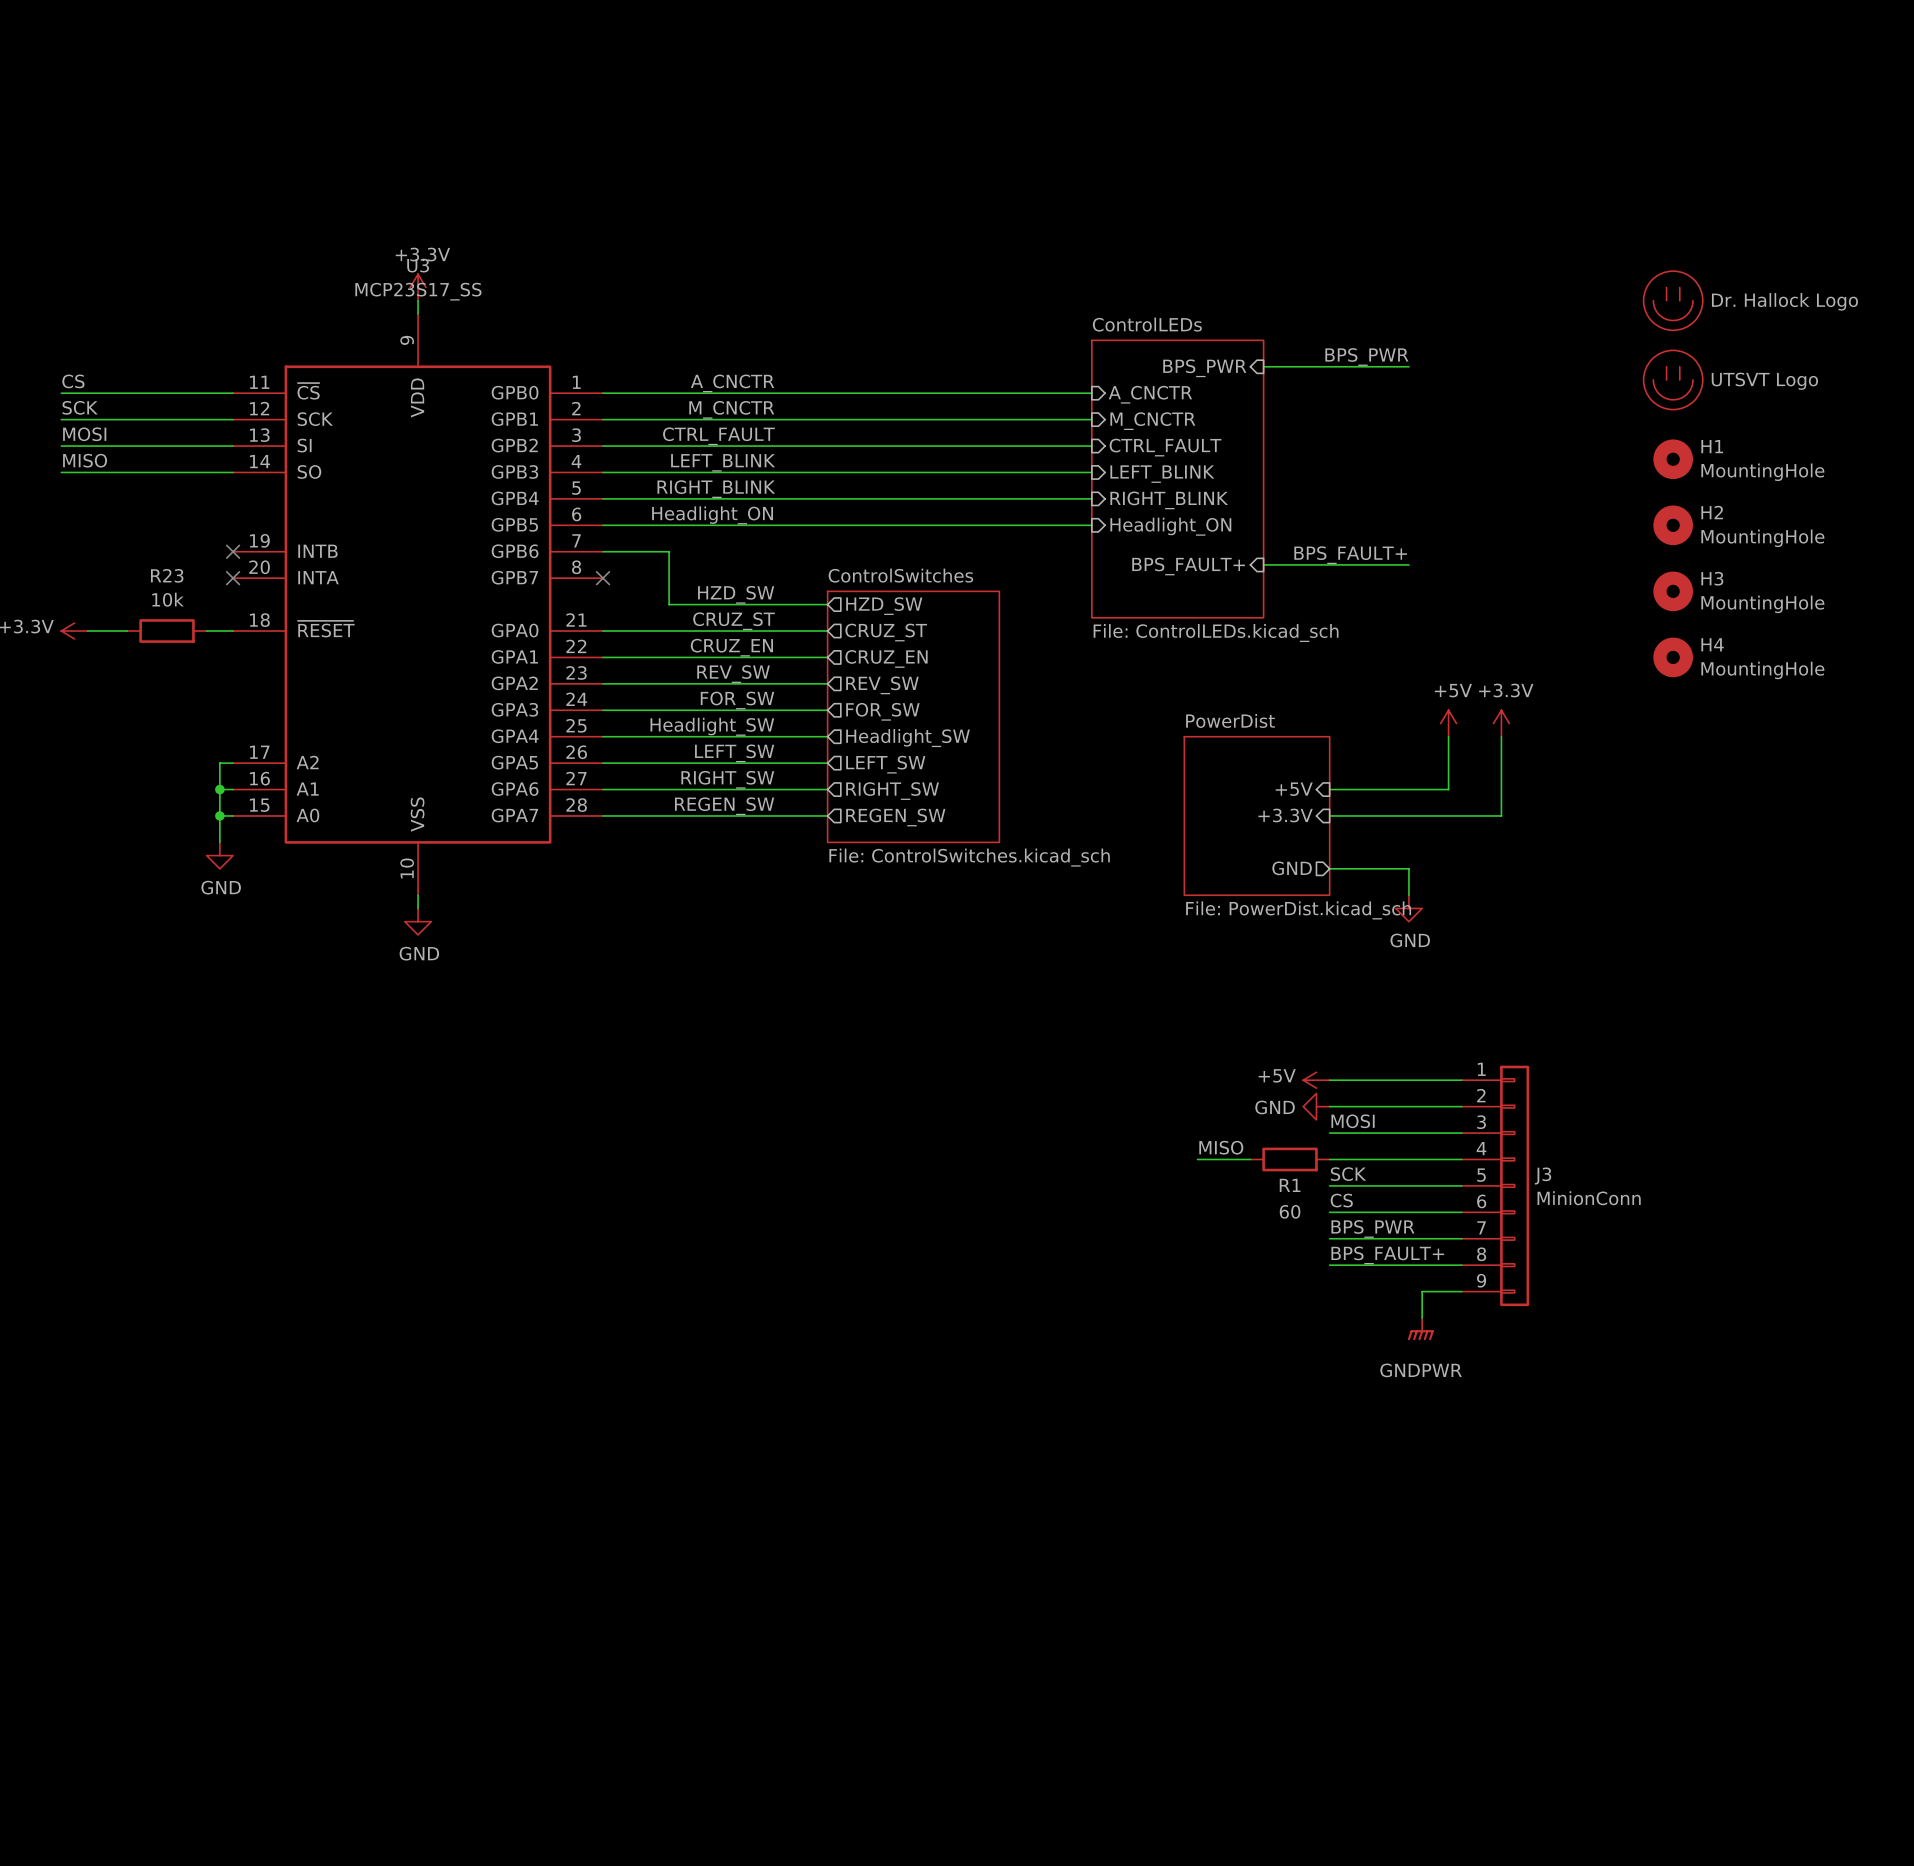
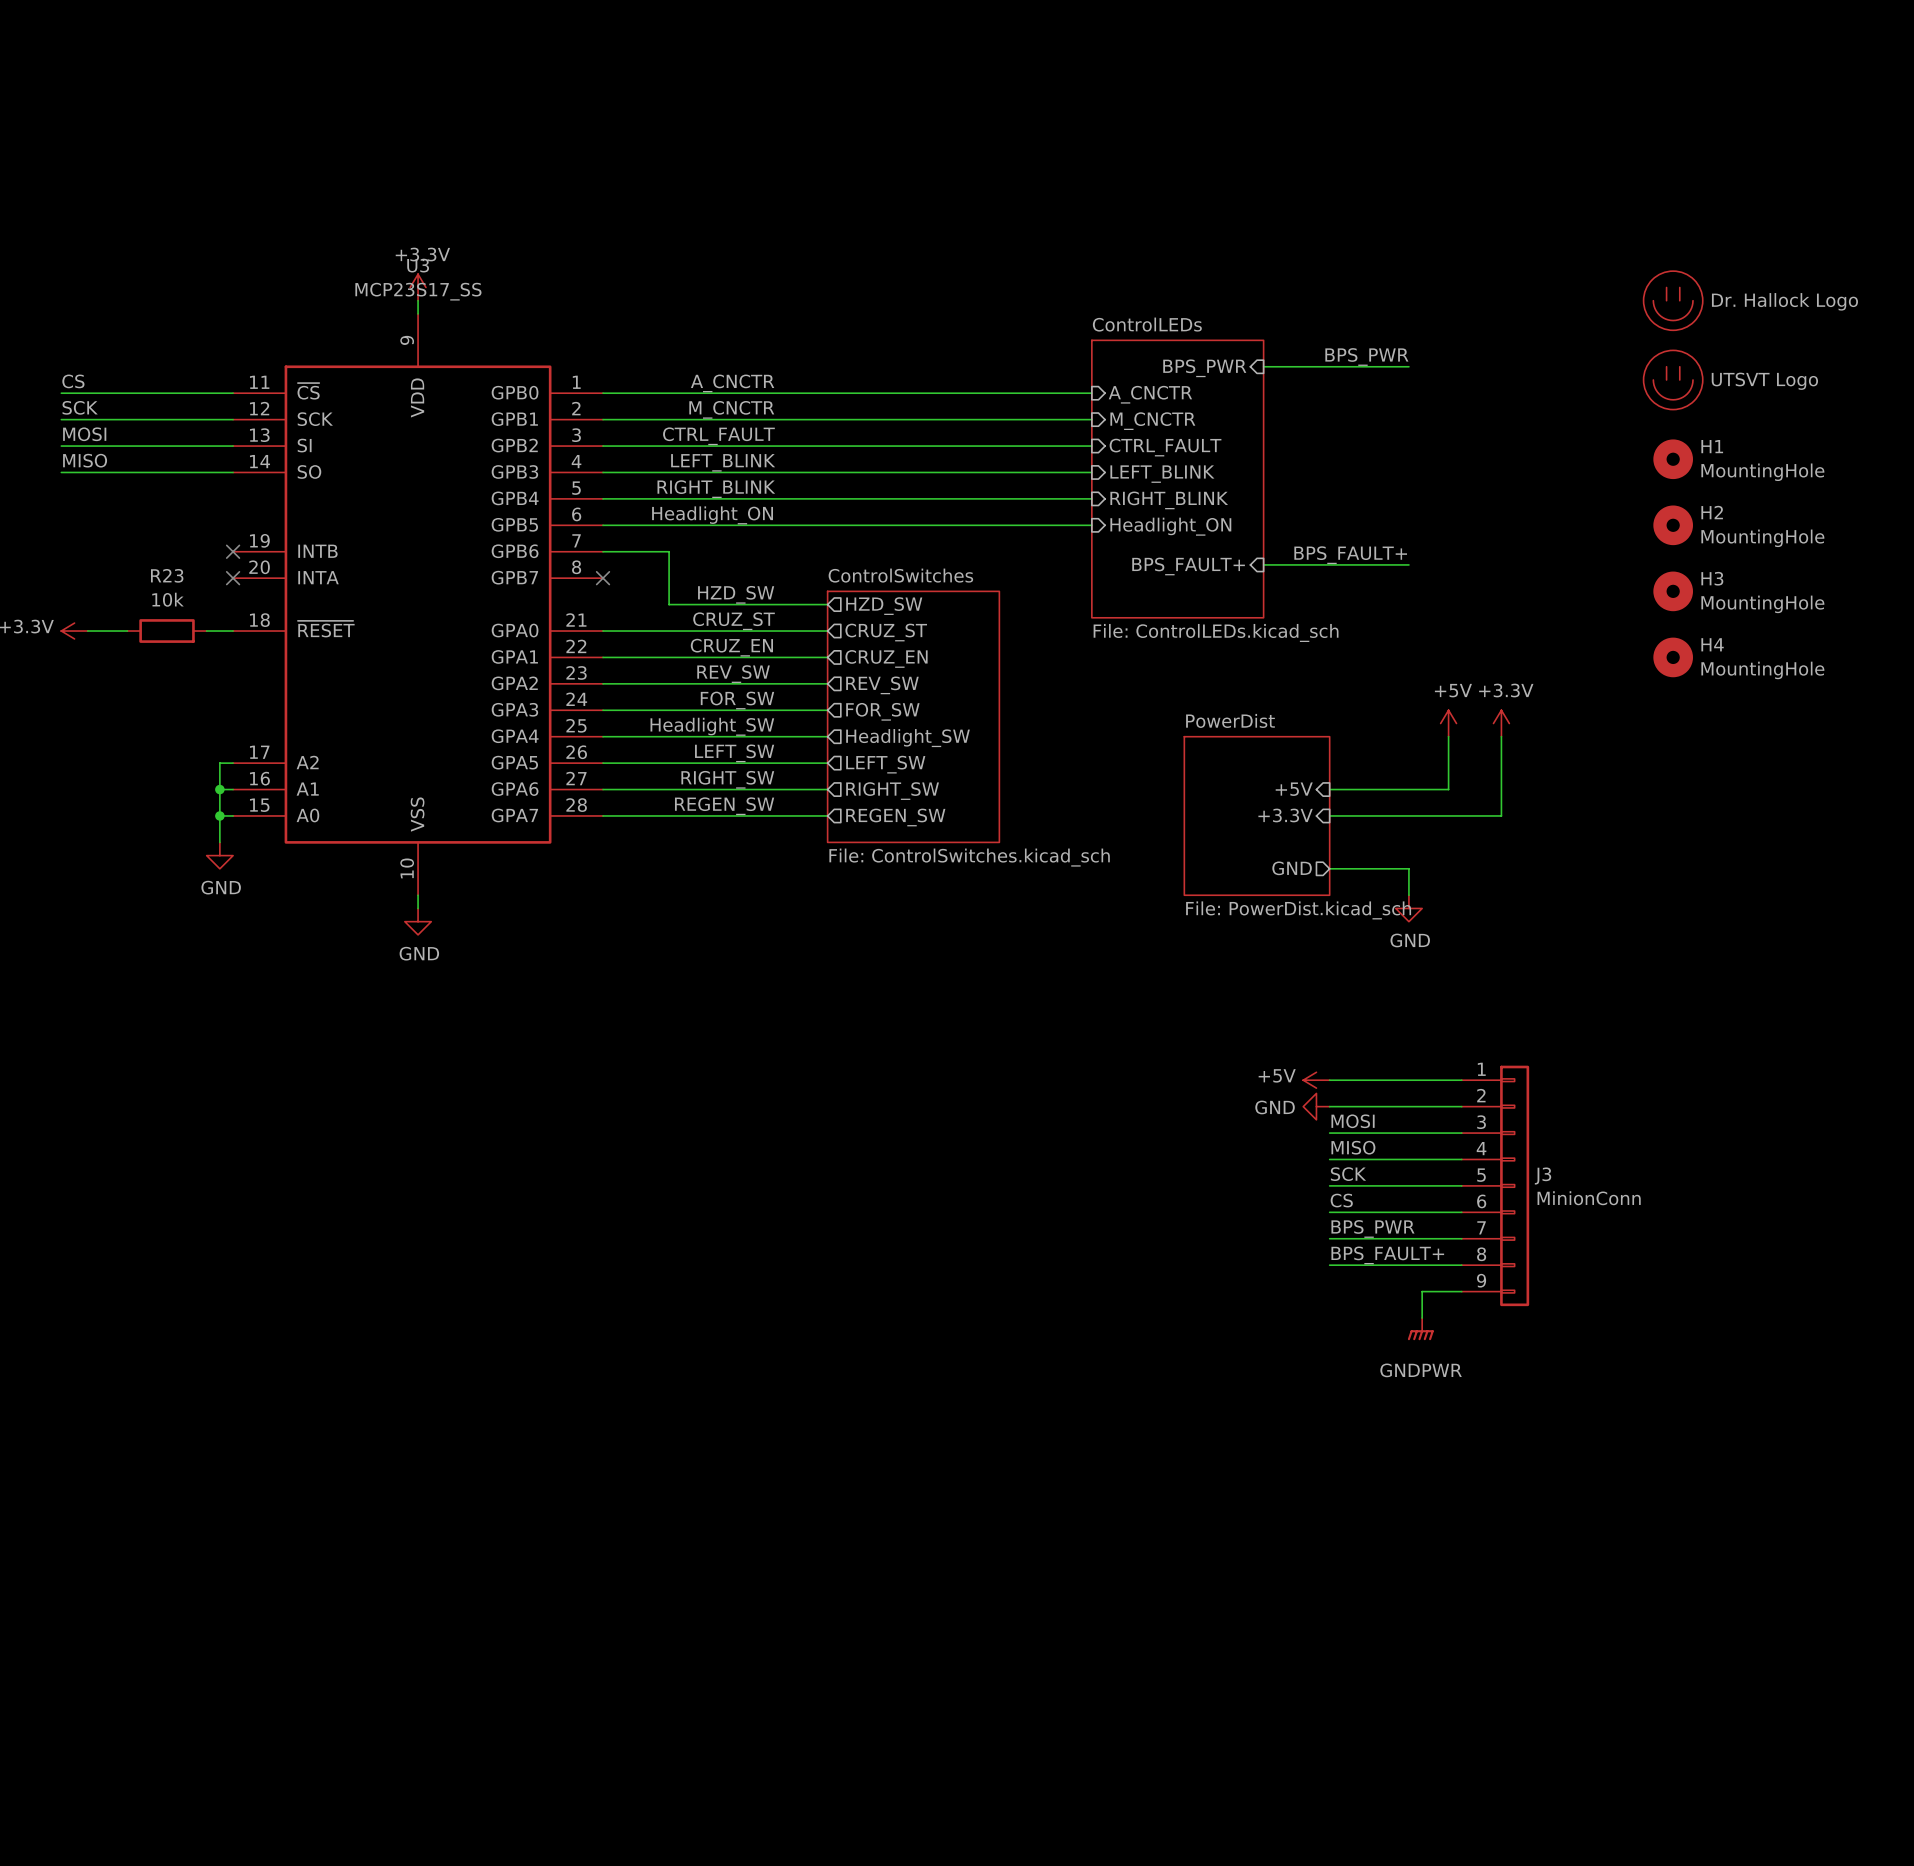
label position: MISO (1221, 1147) -> MISO (1353, 1147)
wire: (1197, 1159) (1250, 1159) -> none
R1: 60 (1290, 1159) -> none

